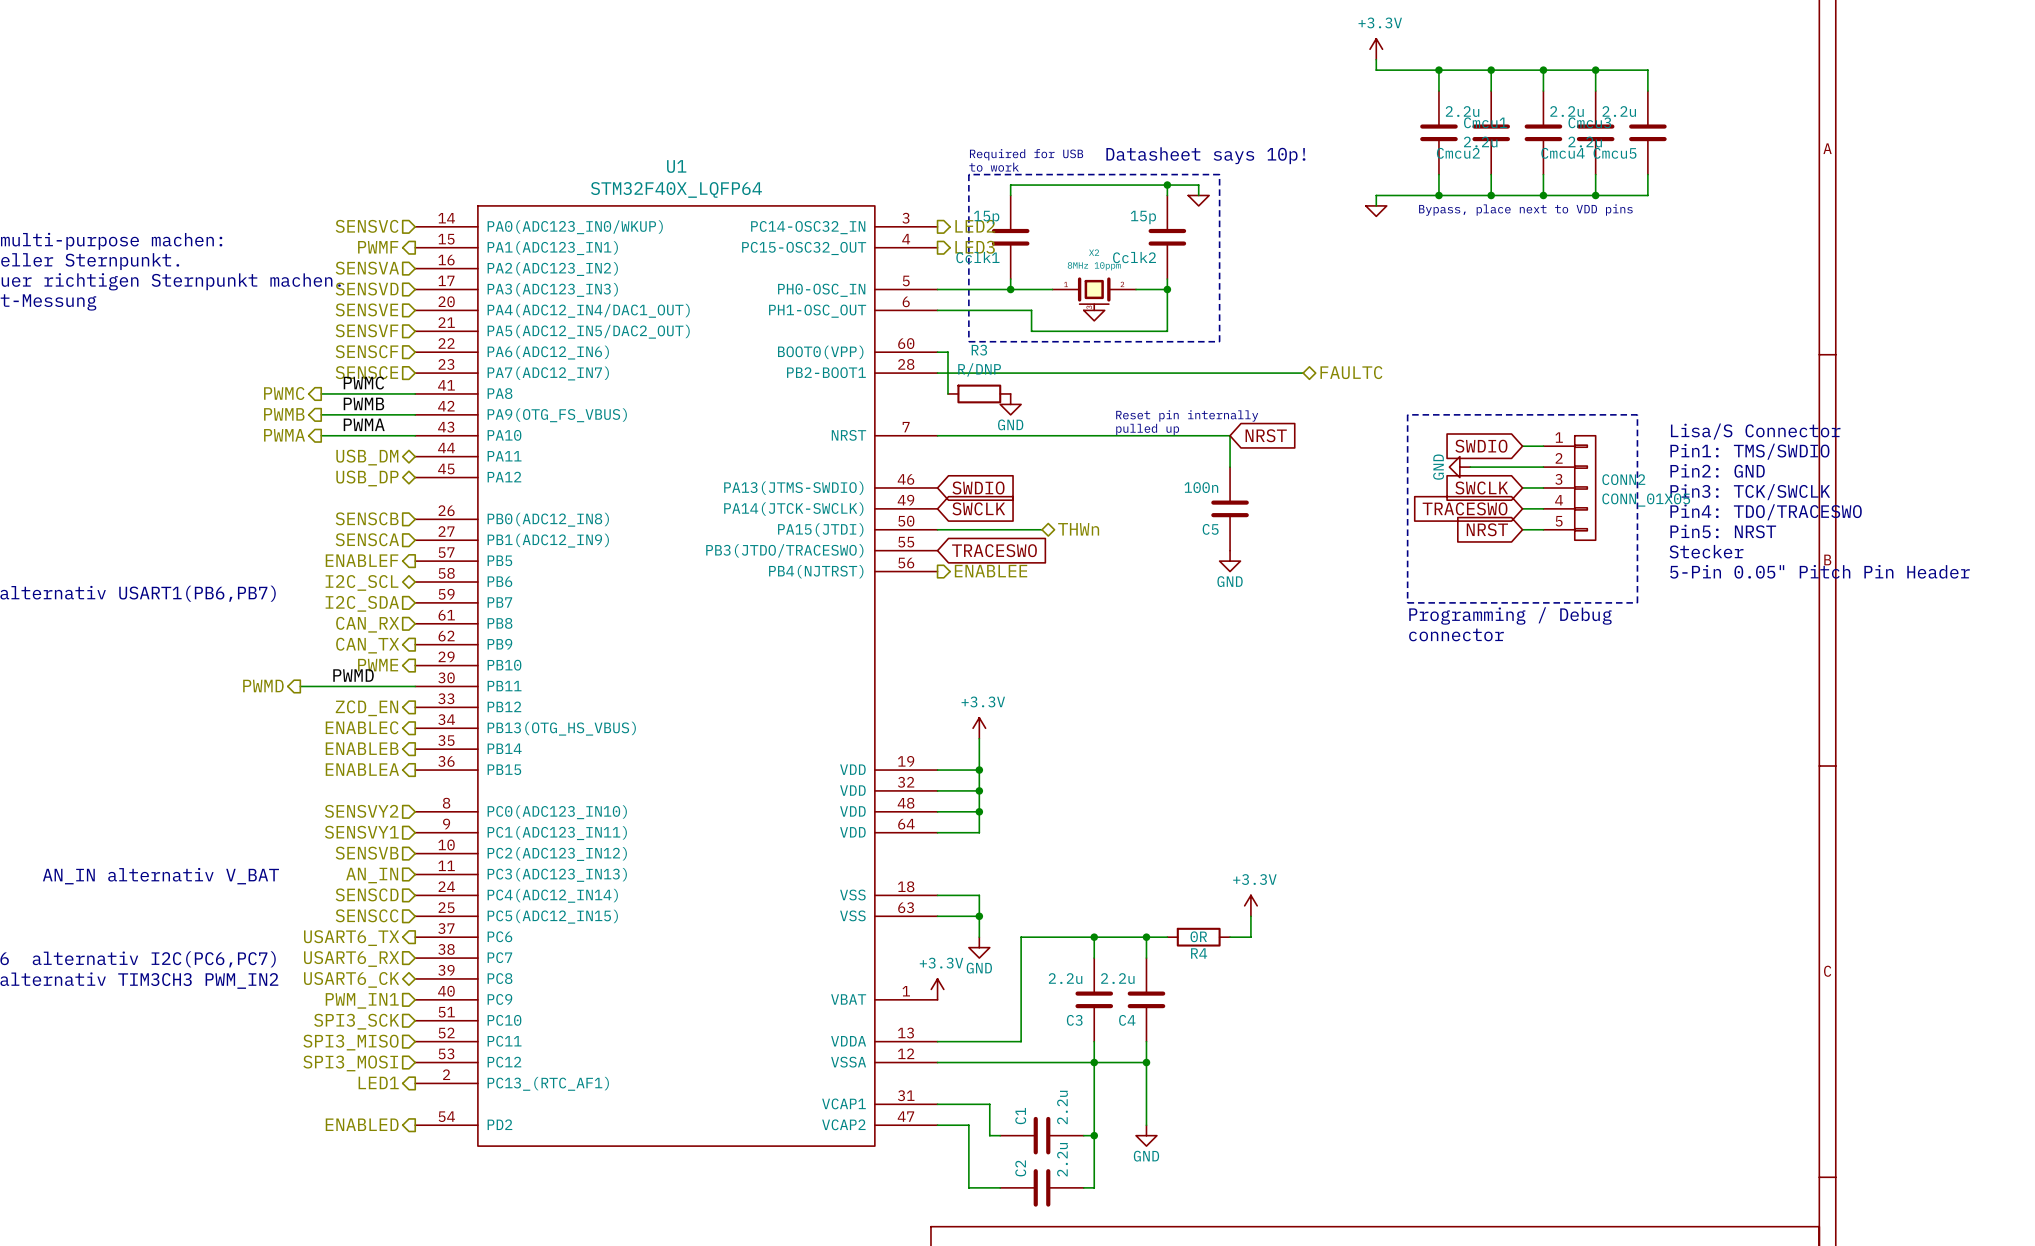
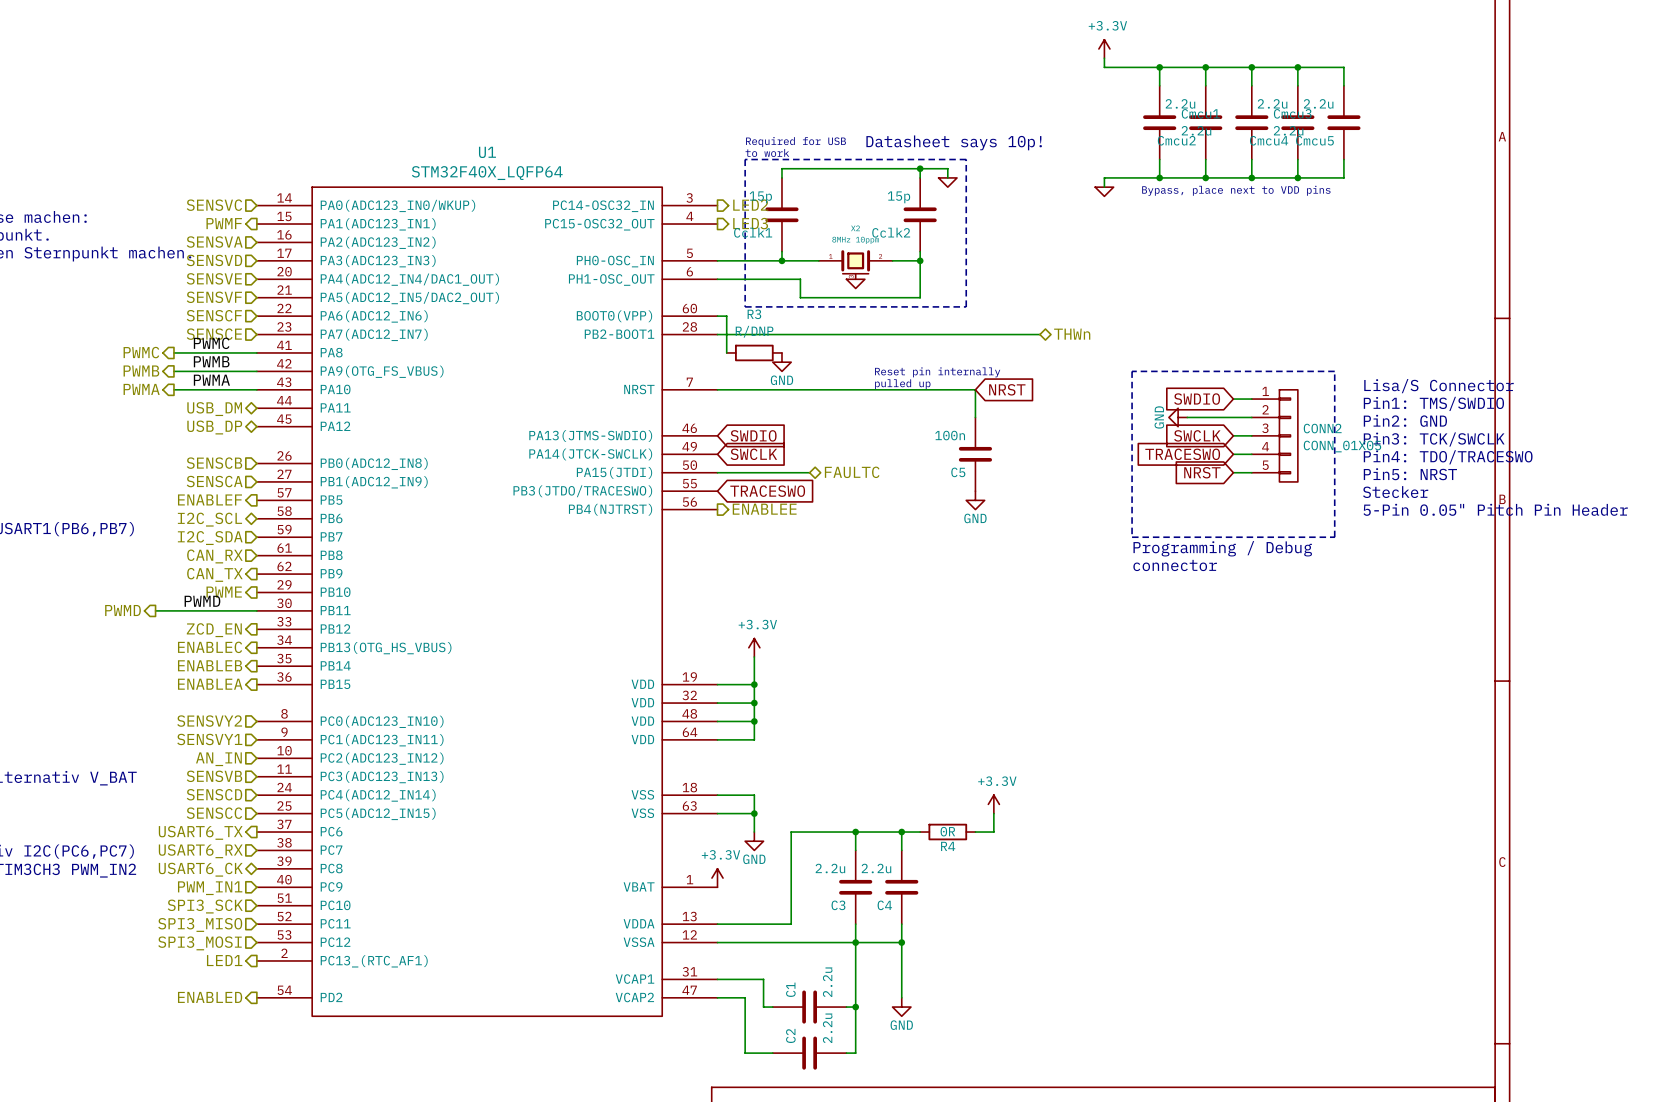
hierarchical label: FAULTC (1351, 372) -> THWn (1072, 334)
hierarchical label: THWn (1078, 529) -> FAULTC (852, 472)
hierarchical label: SENSVB (367, 853) -> AN_IN (218, 759)
hierarchical label: AN_IN (372, 875) -> SENSVB (214, 776)

